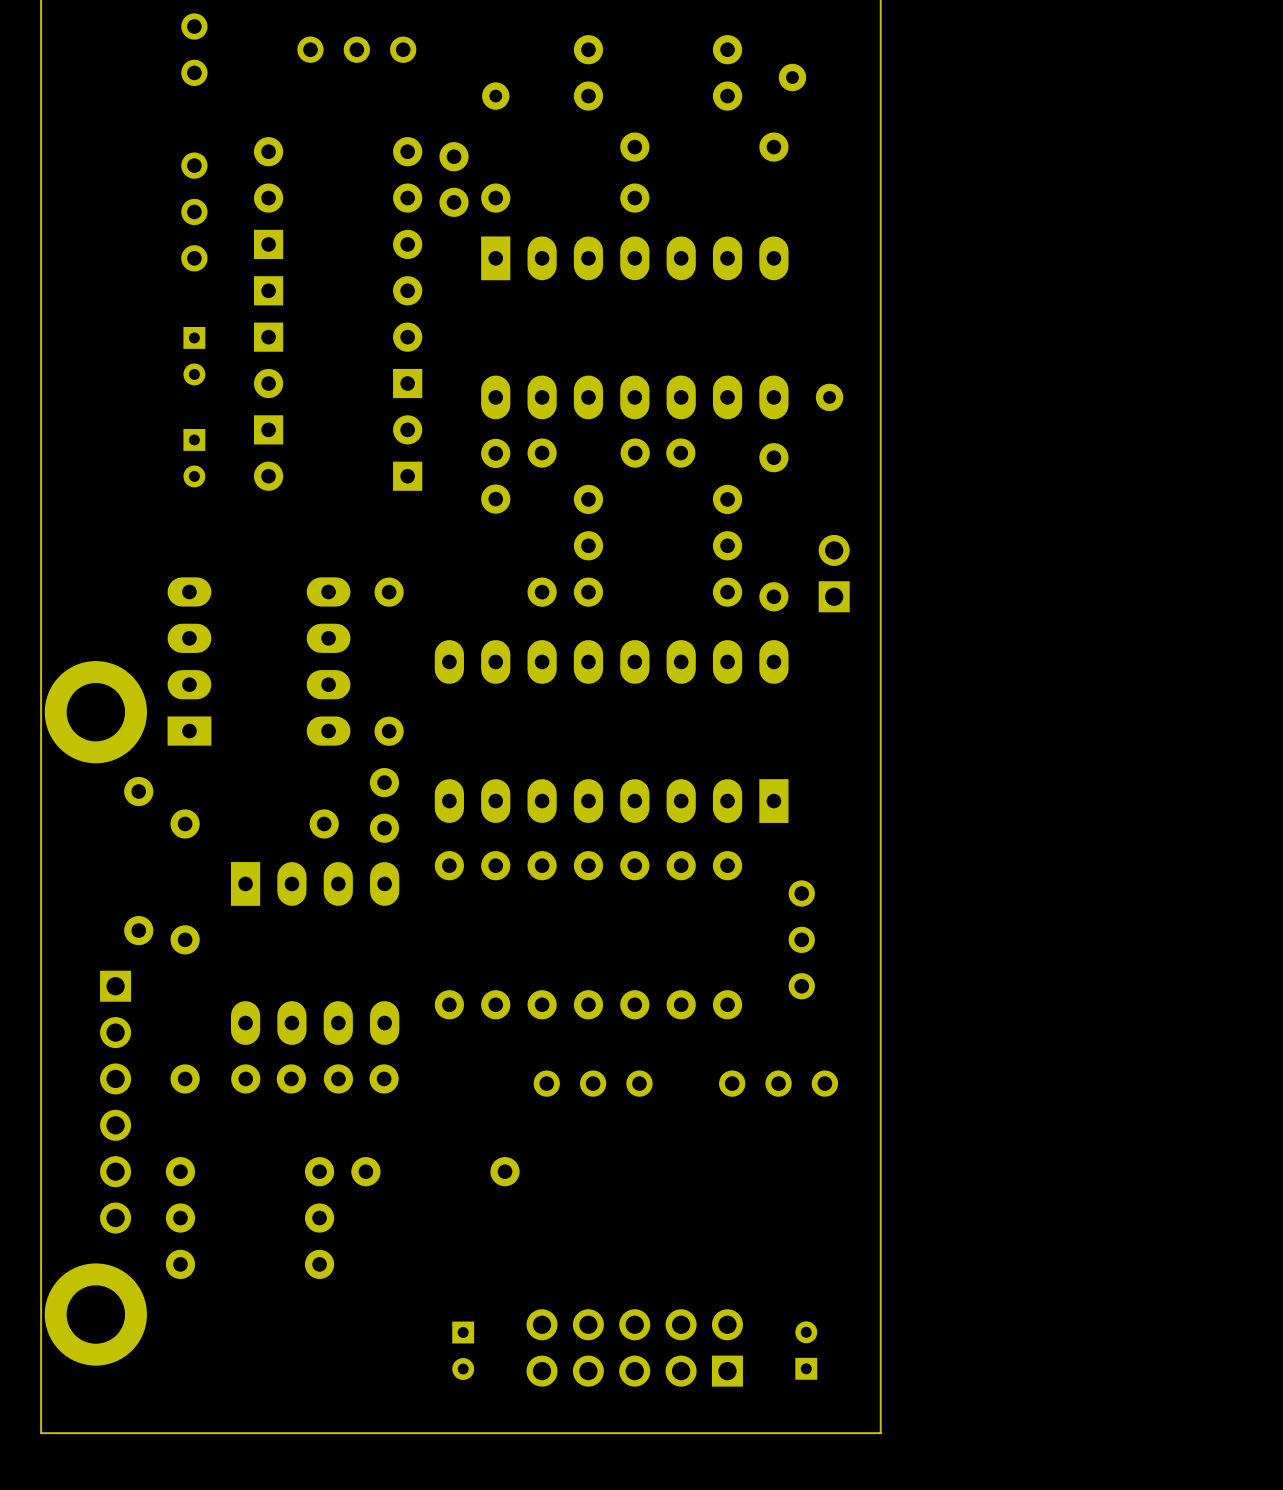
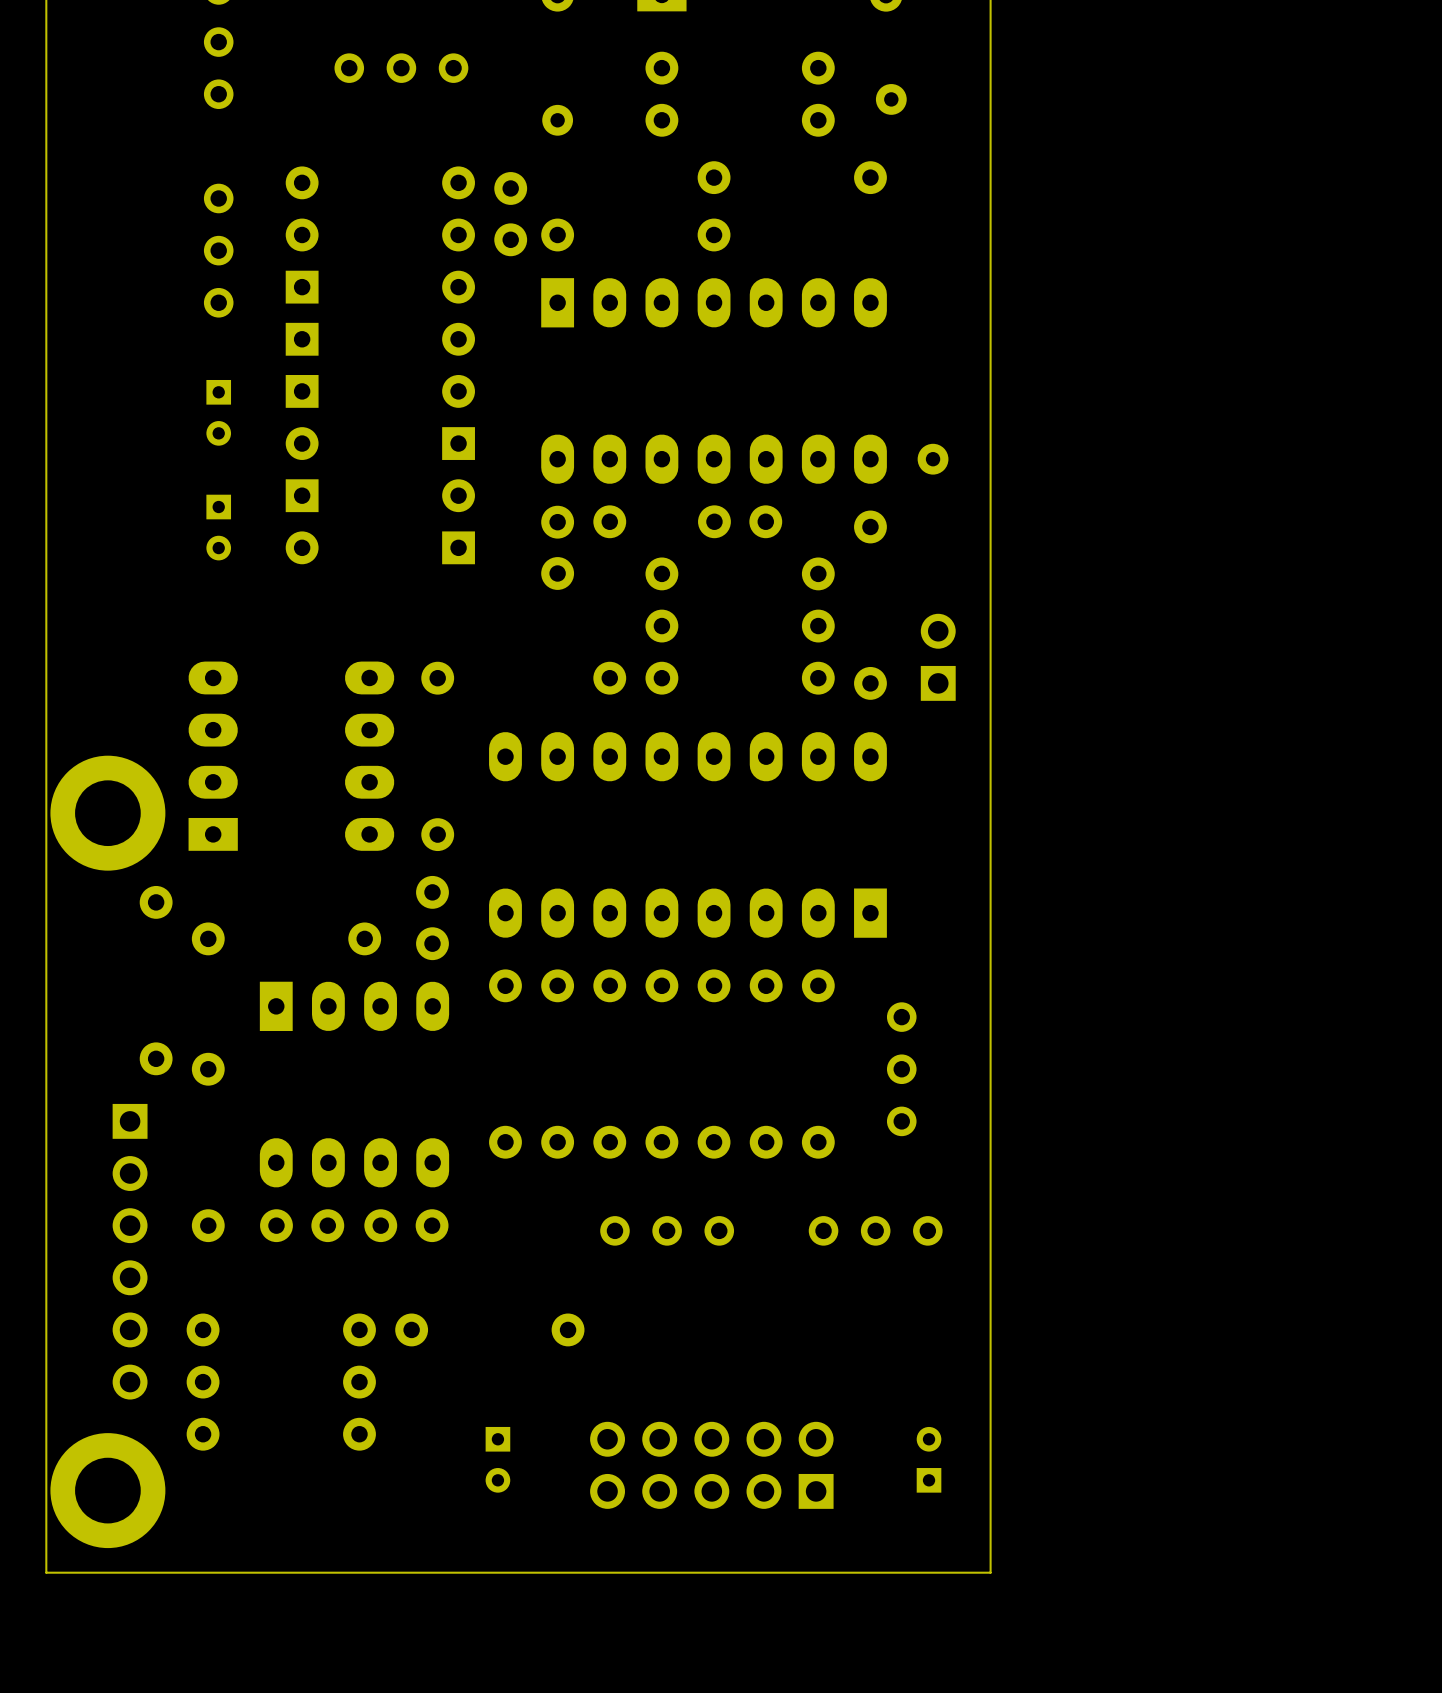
part position: (634, 1347) -> (711, 1465)
part position: (463, 1350) -> (497, 1459)
part position: (806, 1350) -> (929, 1459)
board edge: (880, 1387) (880, 1433) (41, 1433) (41, 1387) -> (990, 1572) (46, 1572)

